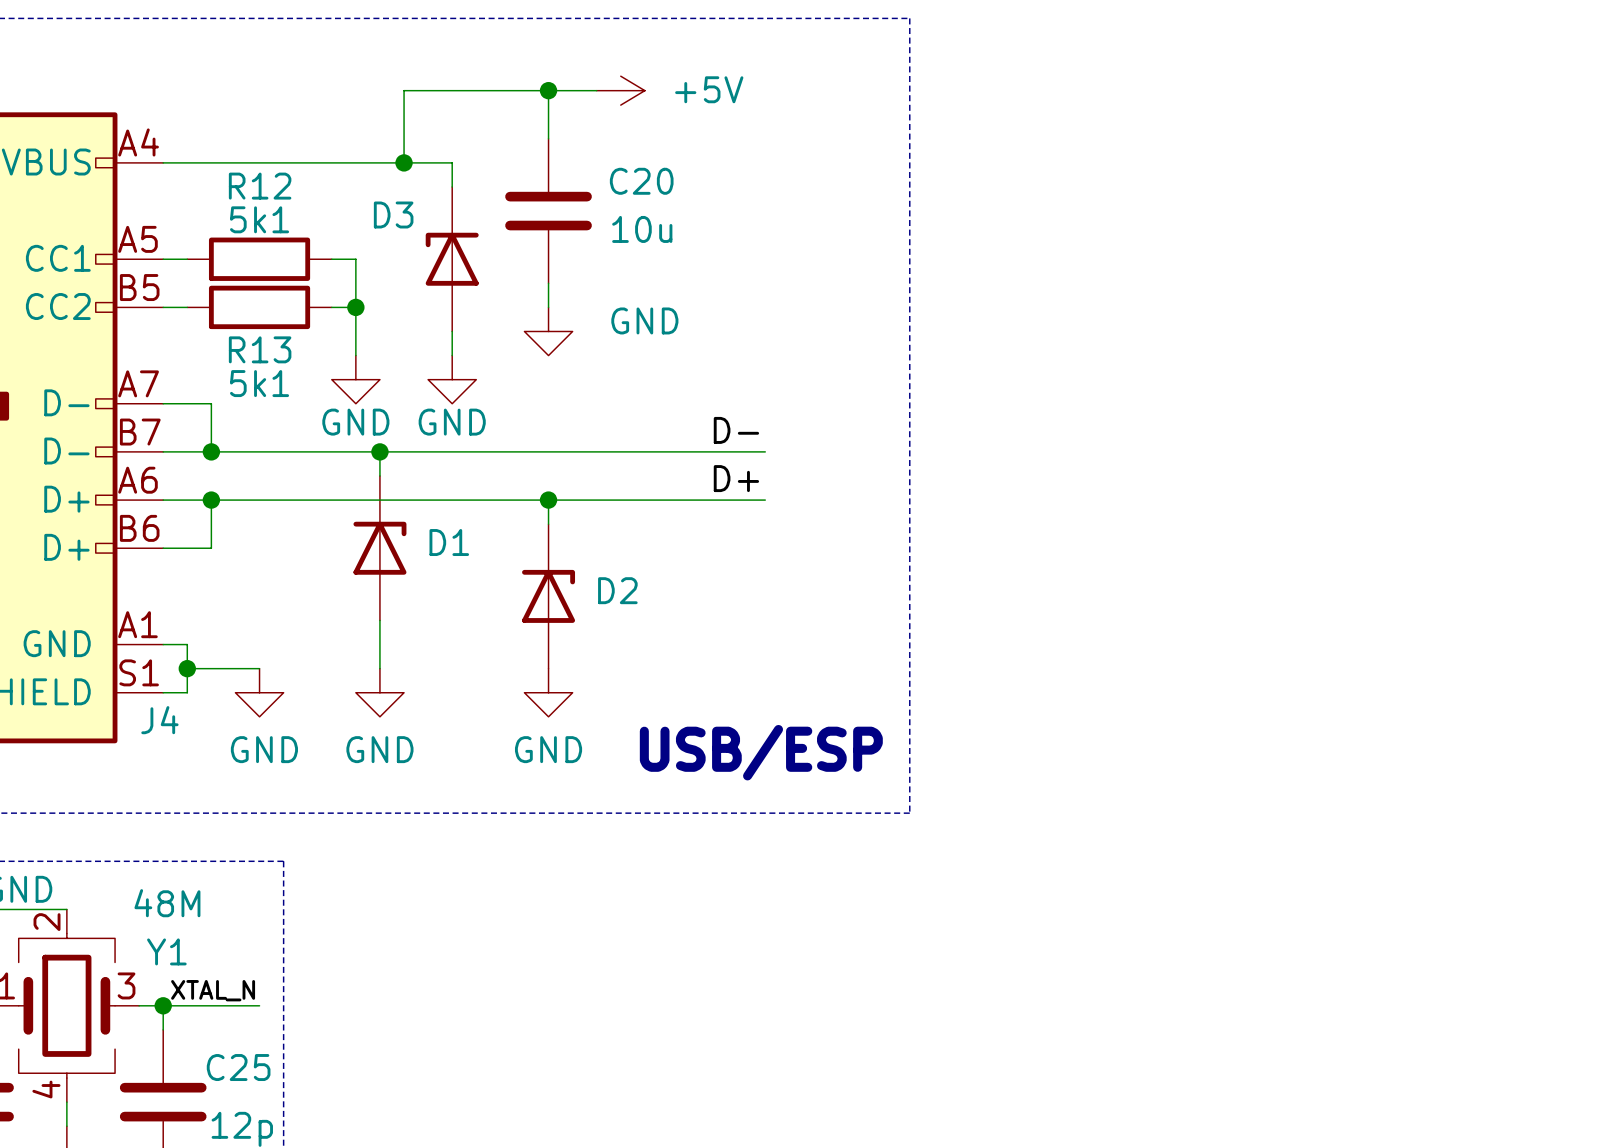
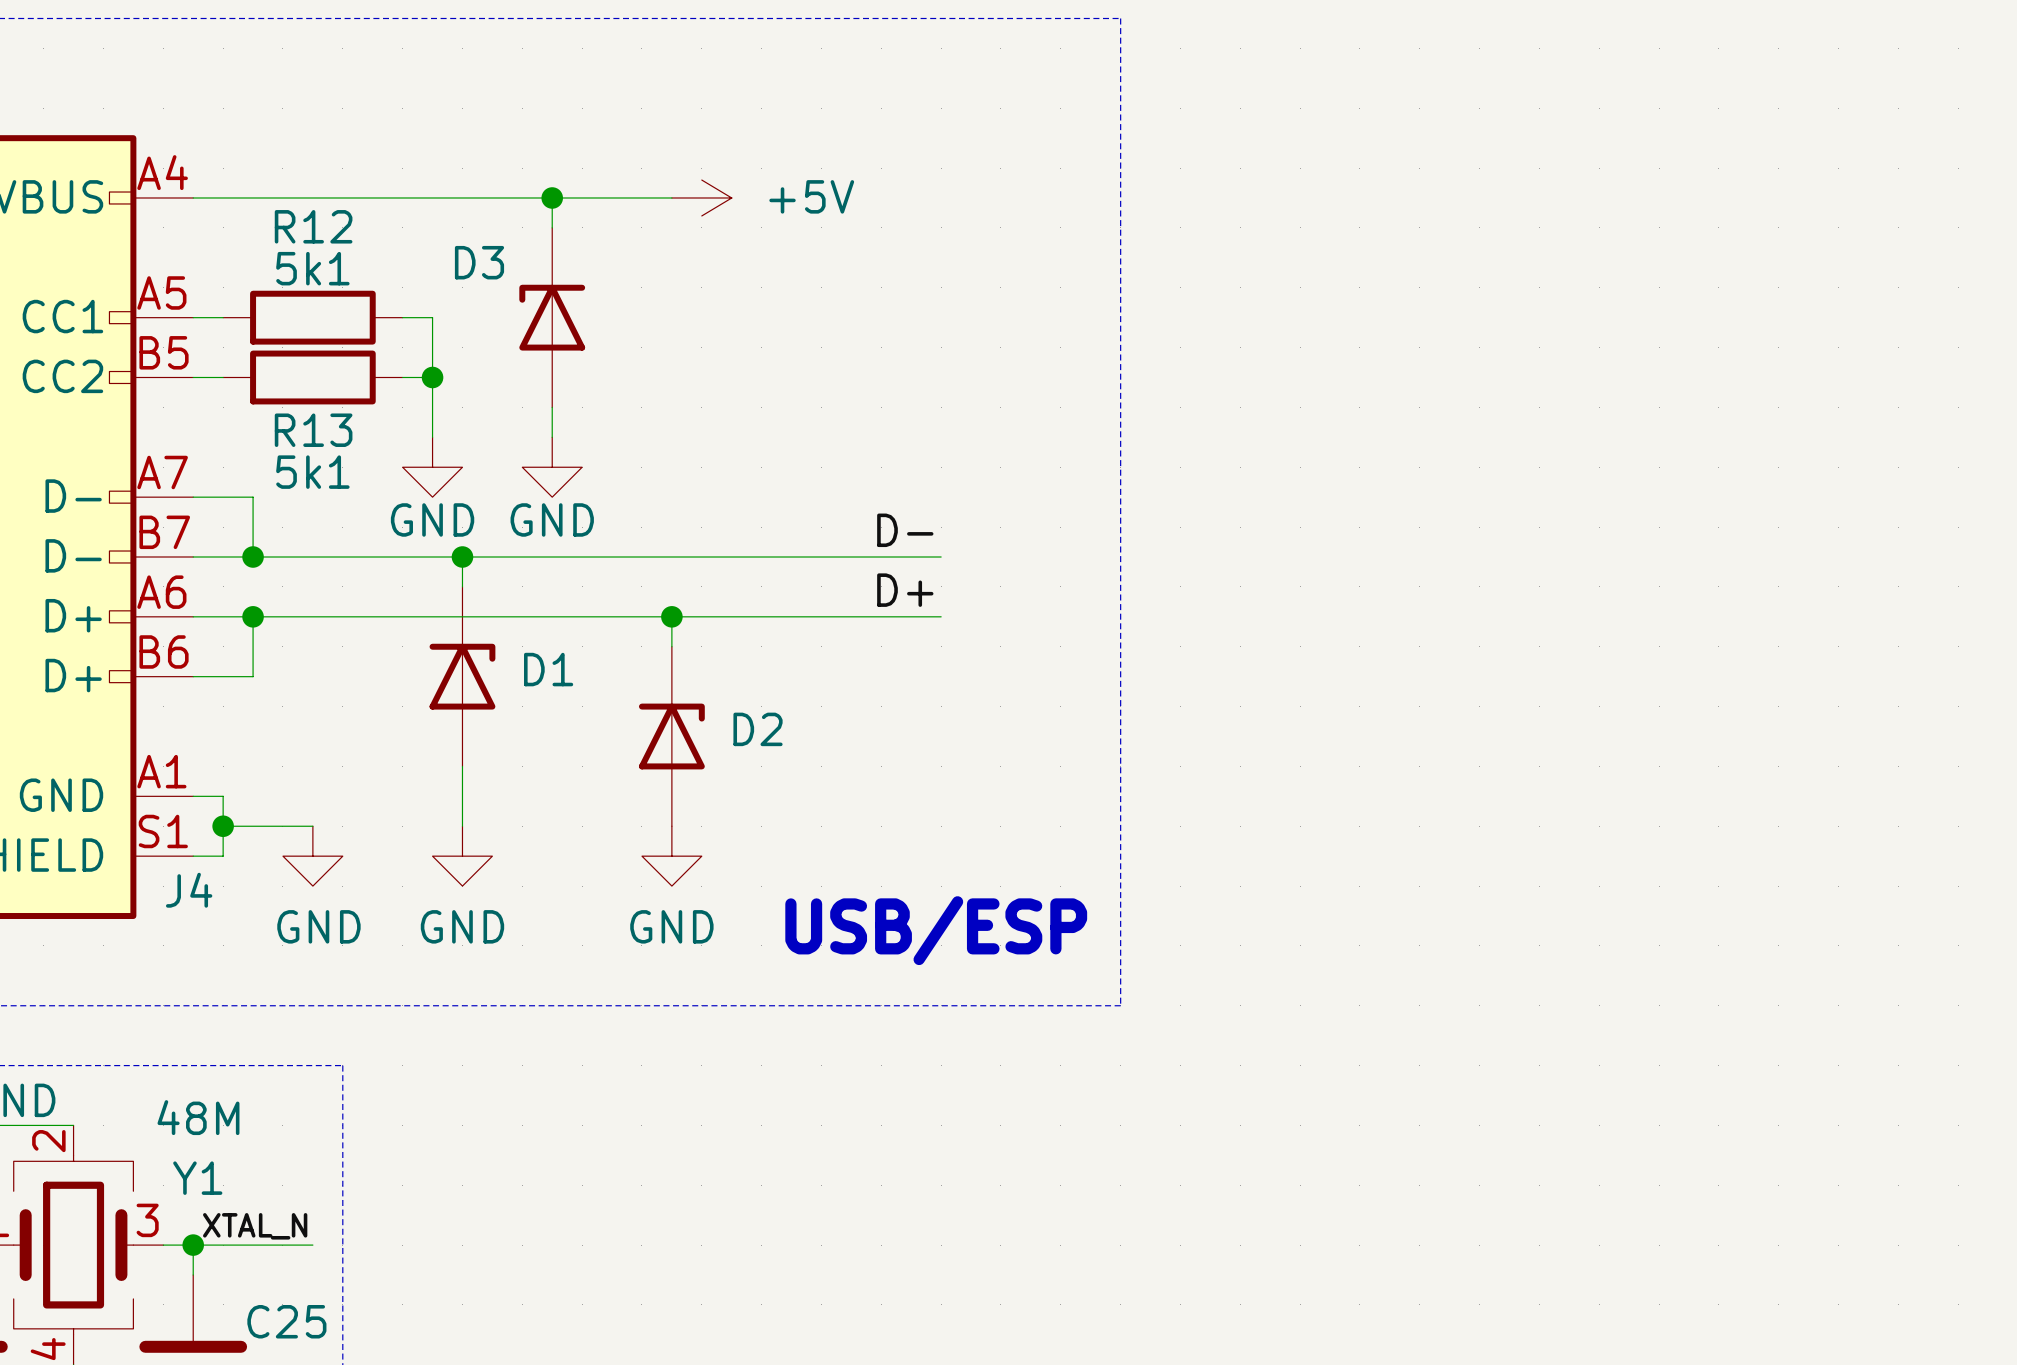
wire: (548, 90) (548, 138) -> none
junction: (548, 90) -> none
wire: (596, 90) (404, 90) (404, 162) -> none
power symbol position: +5V (620, 90) -> +5V (701, 197)
junction position: (404, 162) -> (552, 197)
wire: none -> (552, 197) (671, 197)
C20: 10u (548, 211) -> none
wire: (548, 283) (548, 307) -> none
power symbol: GND (548, 331) -> none

